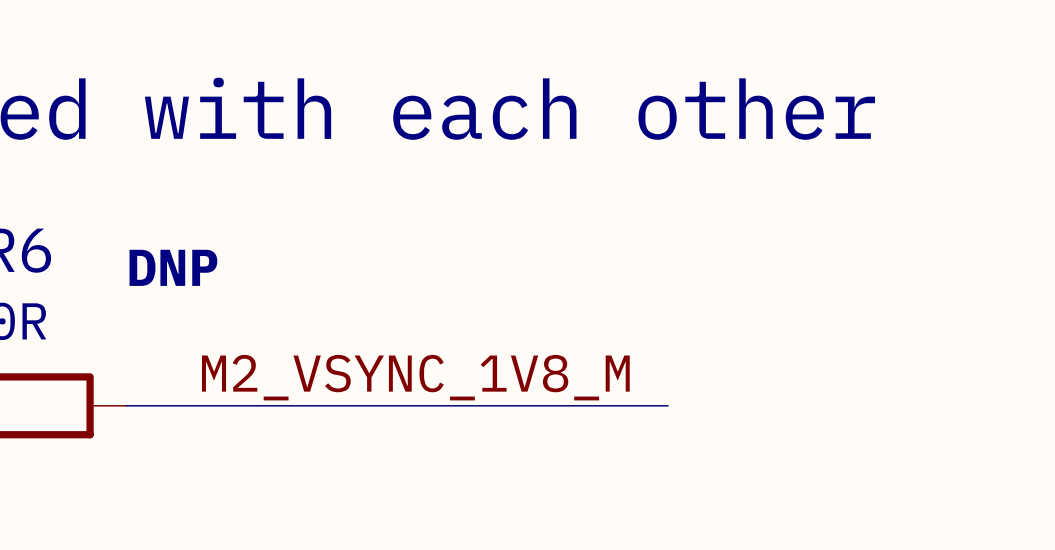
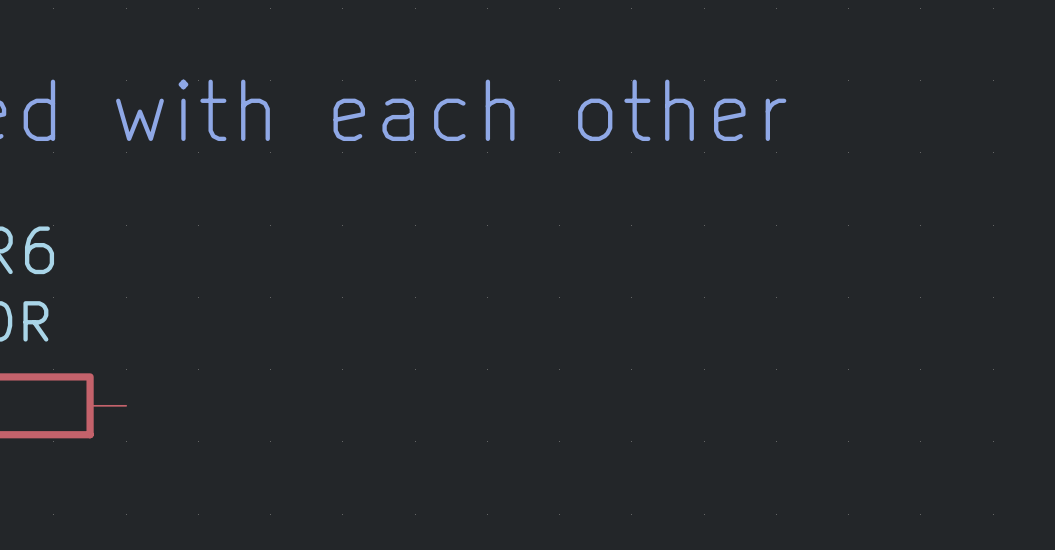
text: DNP (173, 267) -> none
label: M2_VSYNC_1V8_M (415, 377) -> none
wire: (126, 405) (668, 405) -> none

